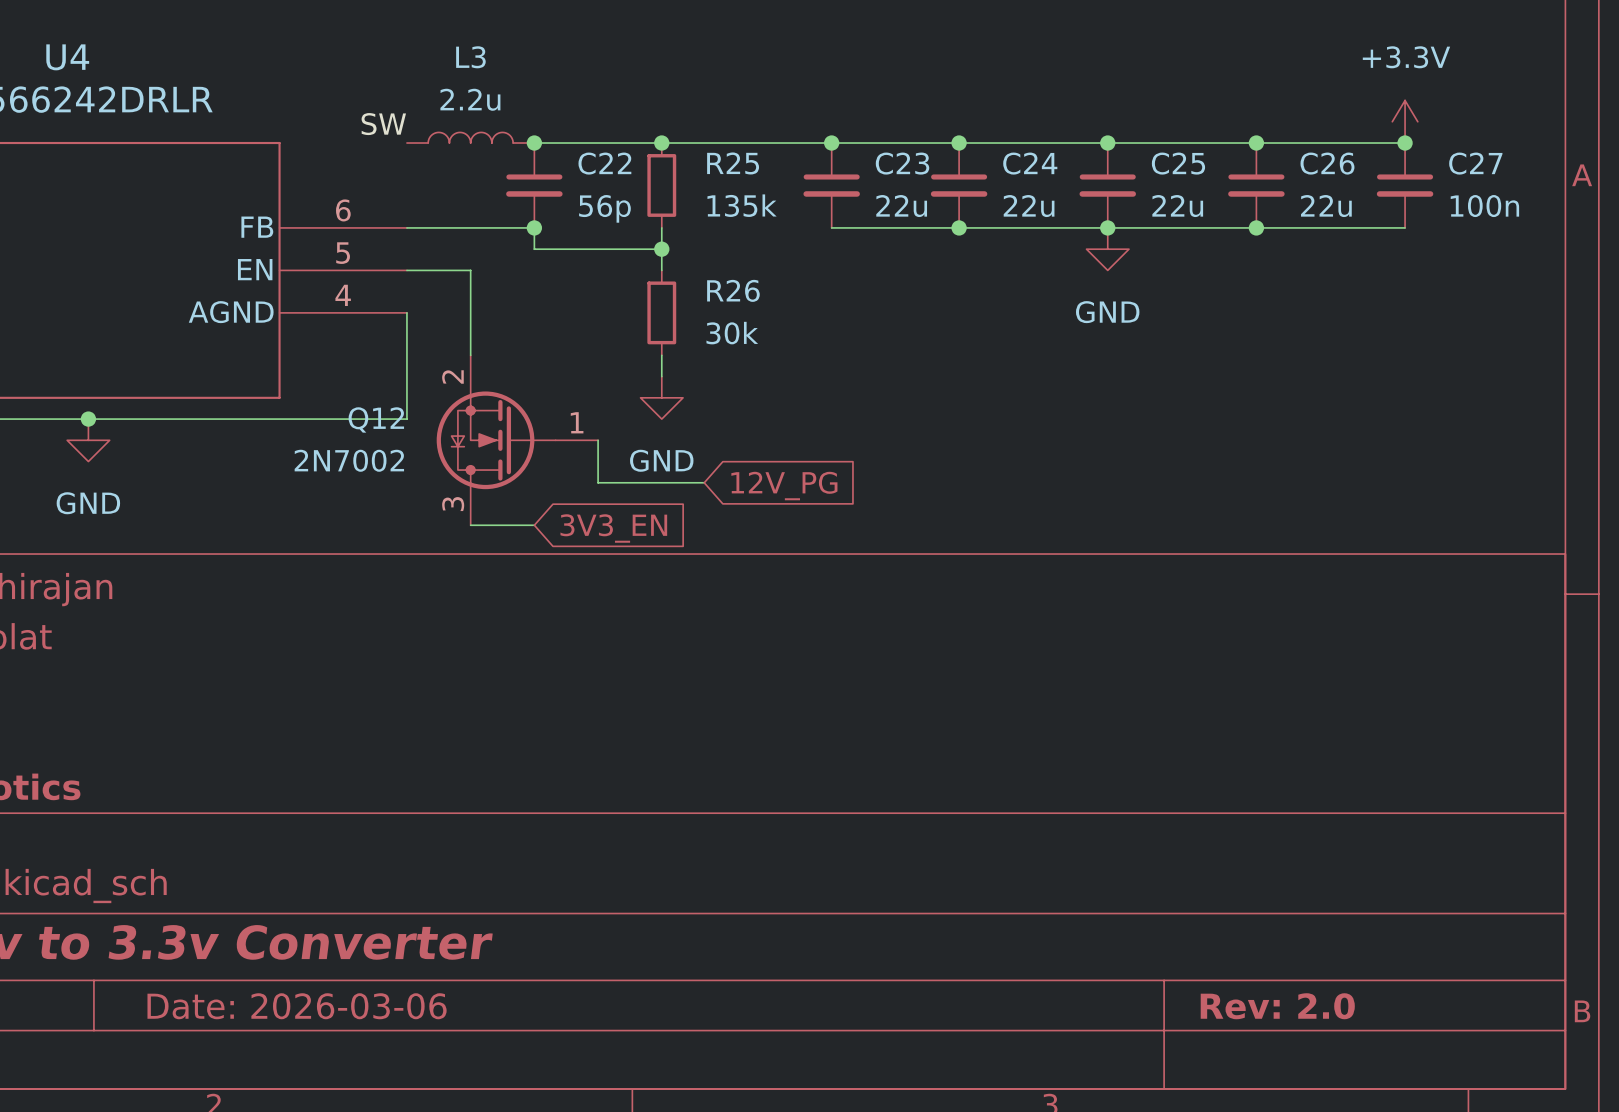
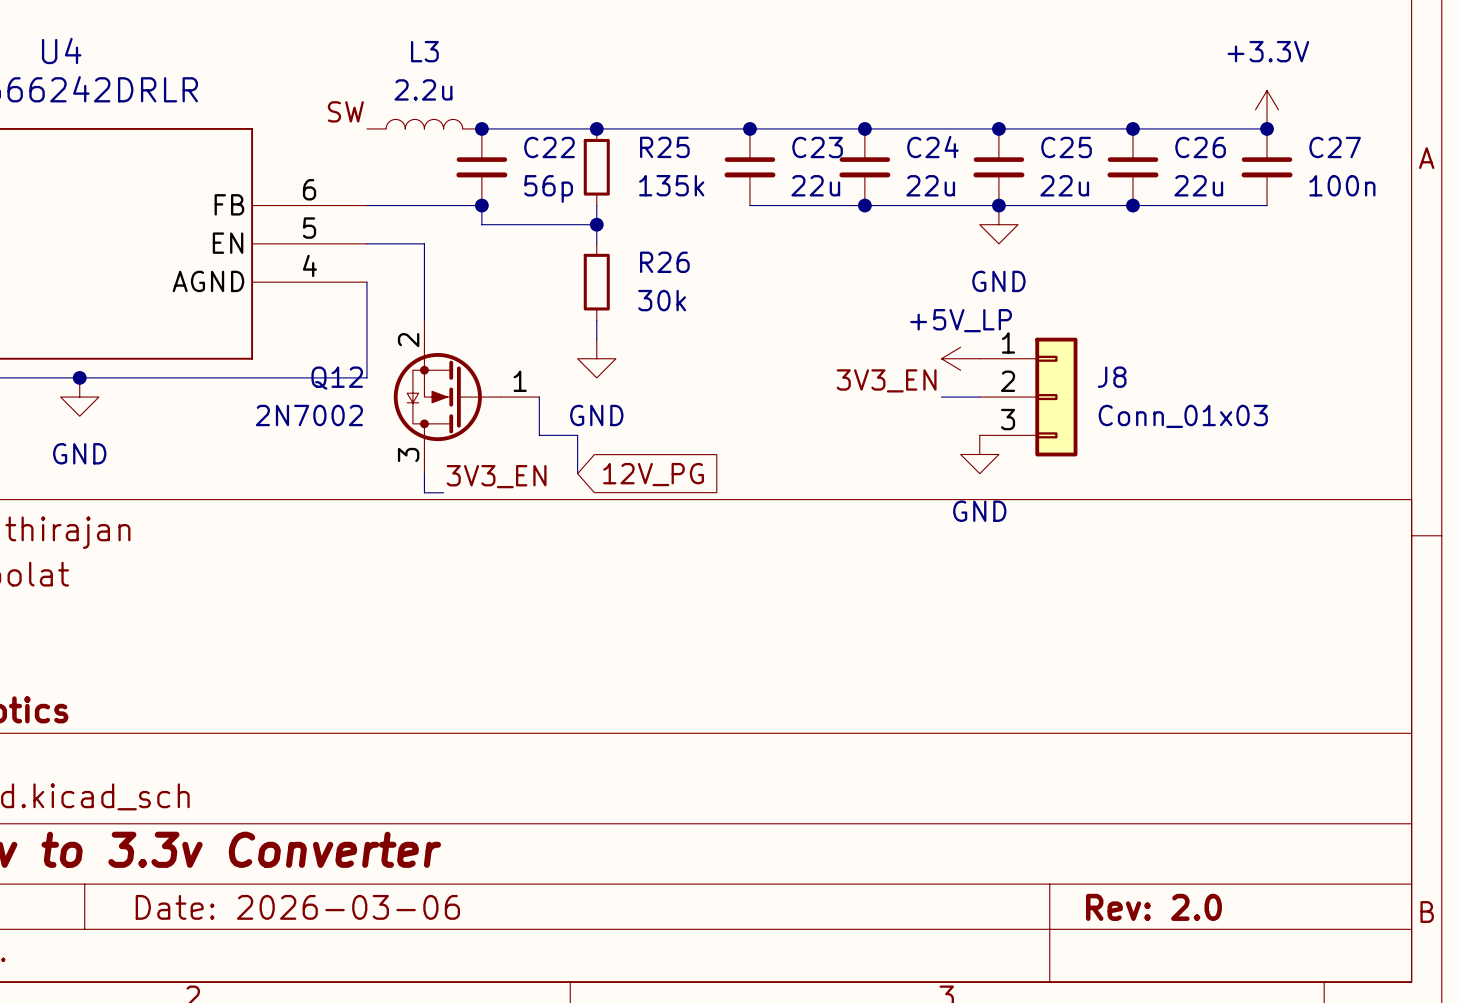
power symbol: none -> +5V_LP (960, 358)
label: none -> 3V3_EN (886, 380)
wire: none -> (941, 397) (979, 397)
J8: none -> Conn_01x03 (1028, 397)
wire: (640, 482) (704, 482) -> (577, 435) (577, 473)
global label position: 12V_PG (784, 486) -> 12V_PG (653, 474)
power symbol: none -> GND (979, 454)
wire: (470, 525) (534, 525) -> (424, 473) (424, 492) (443, 492)
global label: 3V3_EN (613, 528) -> none
label: none -> 3V3_EN (496, 476)

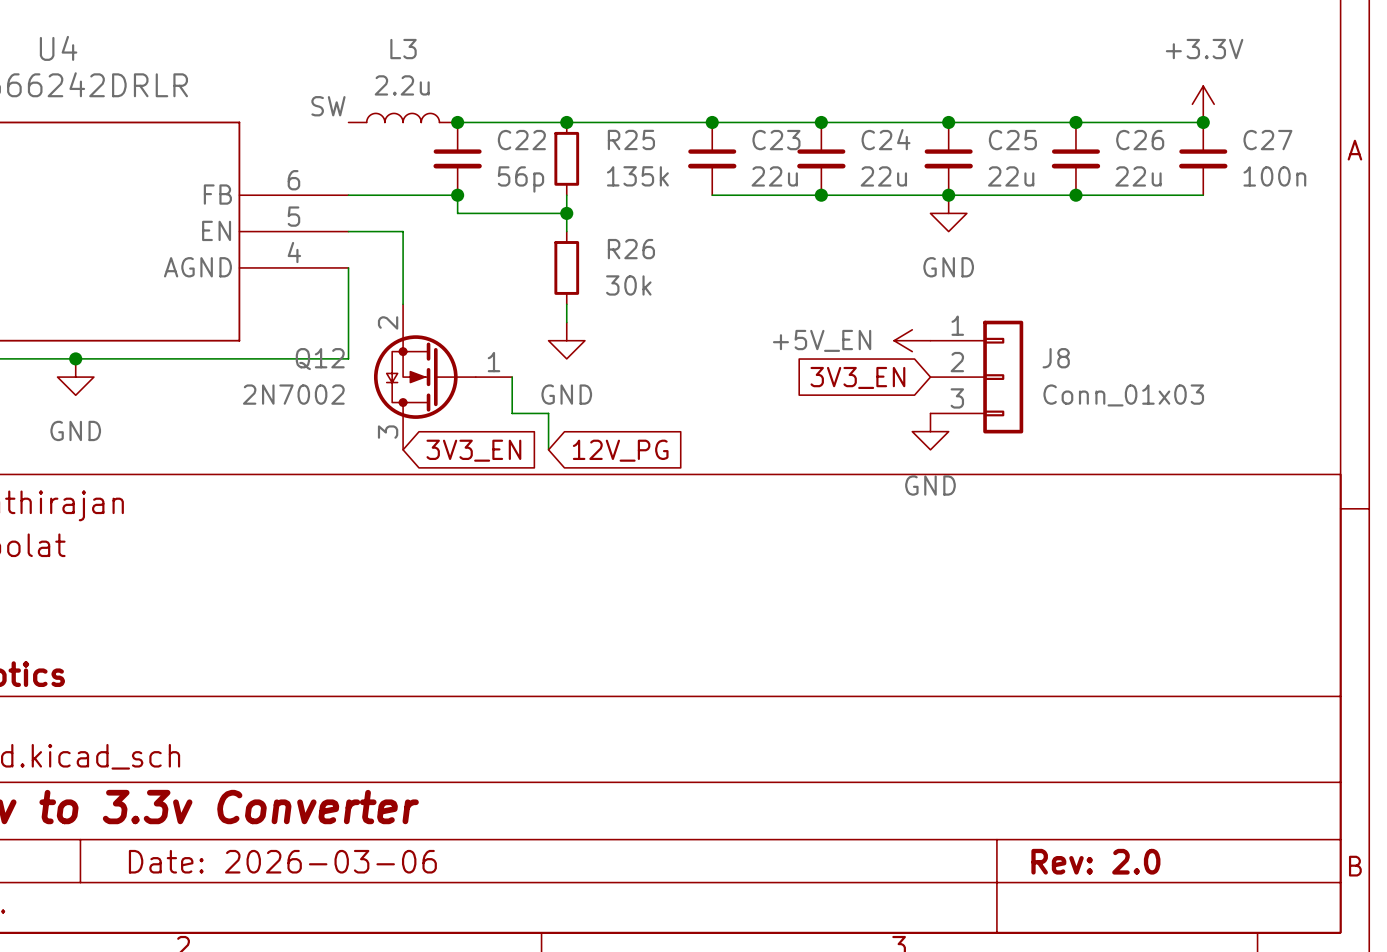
power symbol: +5V_LP (960, 358) -> +5V_EN (912, 340)
label: 3V3_EN (886, 380) -> none
global label: none -> 3V3_EN (857, 377)
wire: (941, 397) (979, 397) -> none
wire: (424, 473) (424, 492) (443, 492) -> none
global label: none -> 3V3_EN (473, 450)
label: 3V3_EN (496, 476) -> none

